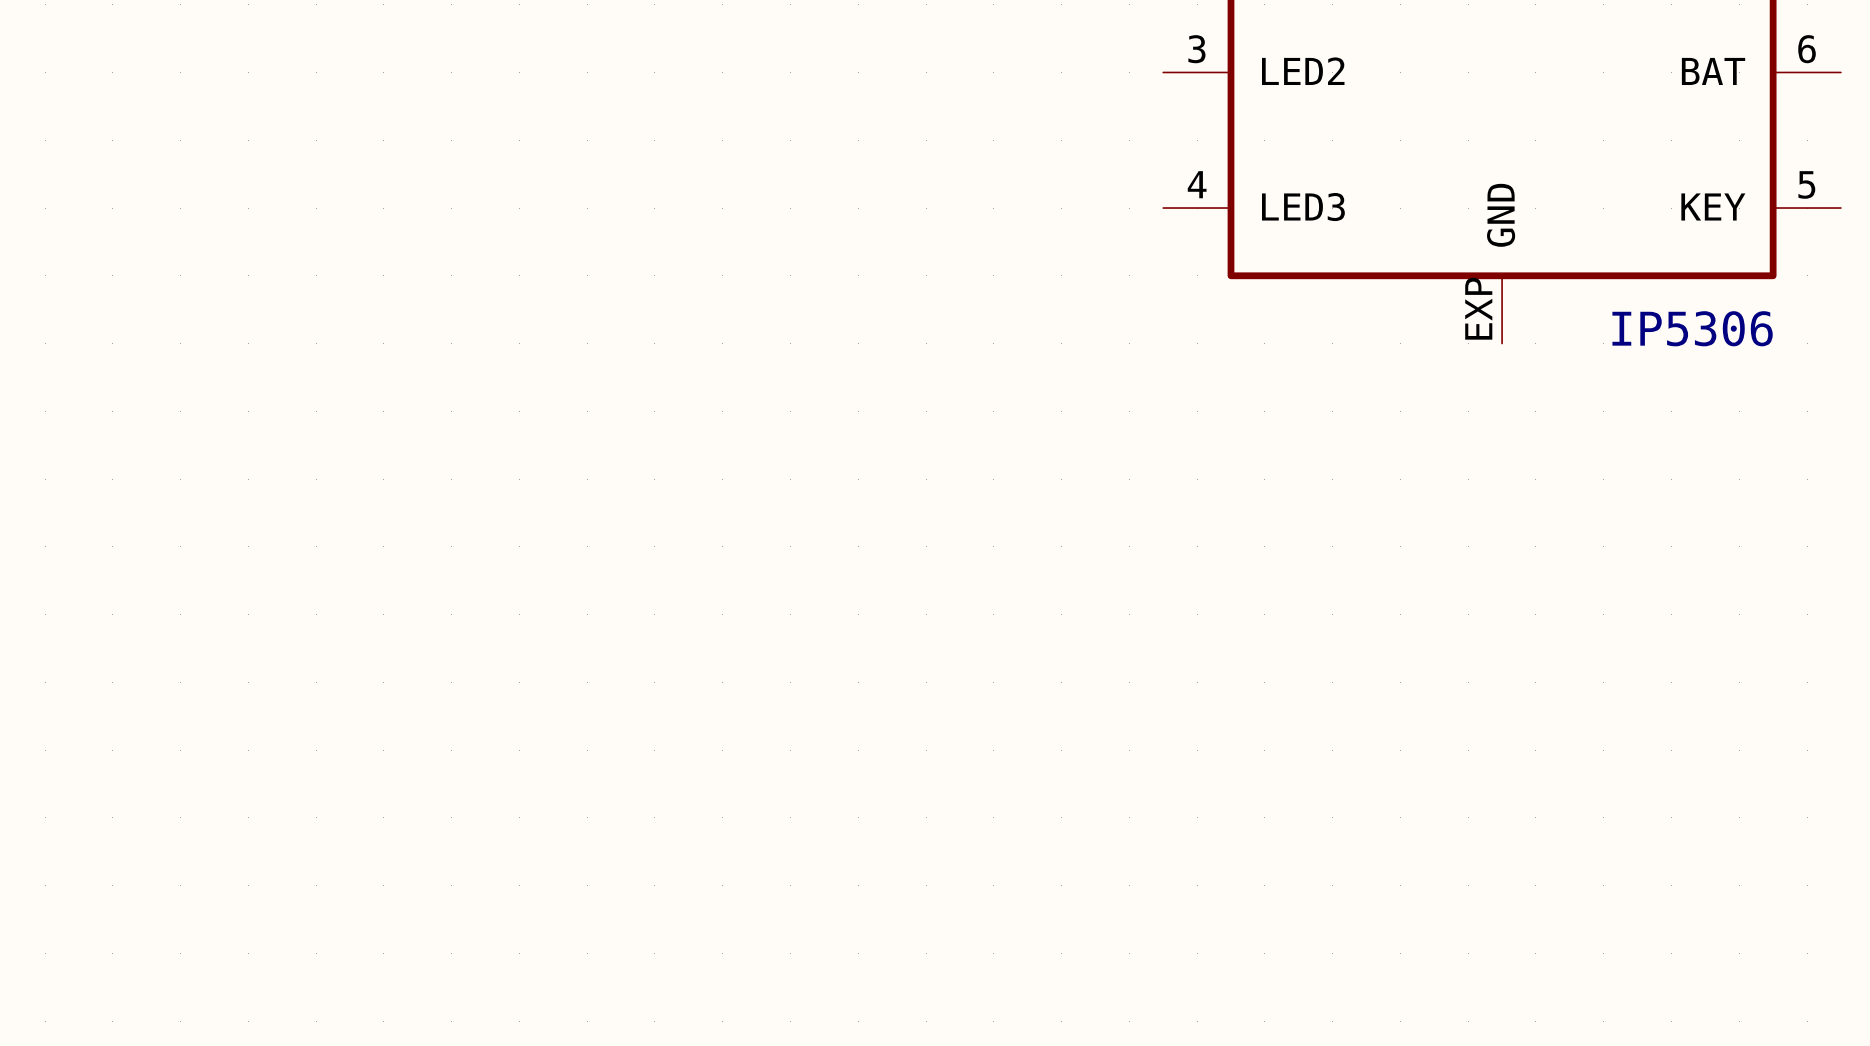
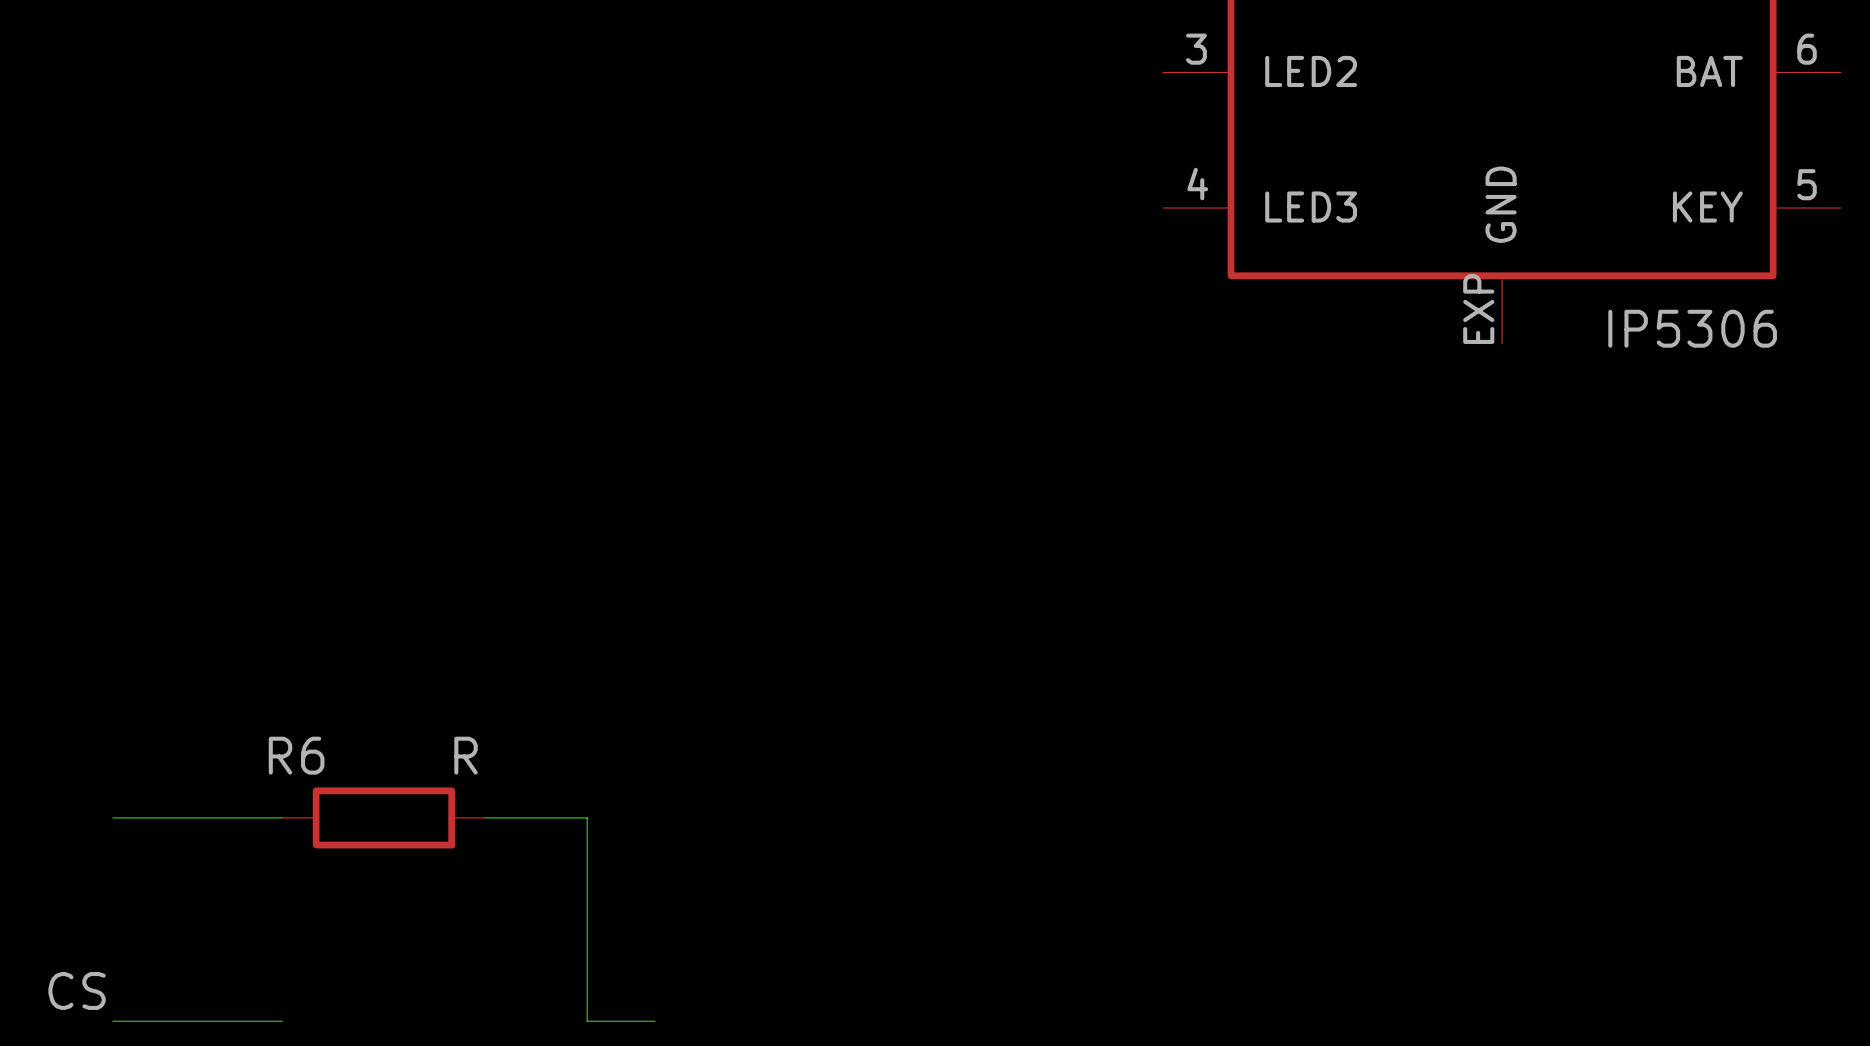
wire: none -> (112, 817) (282, 817)
R6: none -> R (383, 817)
wire: none -> (485, 817) (587, 817) (587, 1021) (654, 1021)
label: none -> CS (77, 990)
wire: none -> (112, 1021) (282, 1021)

